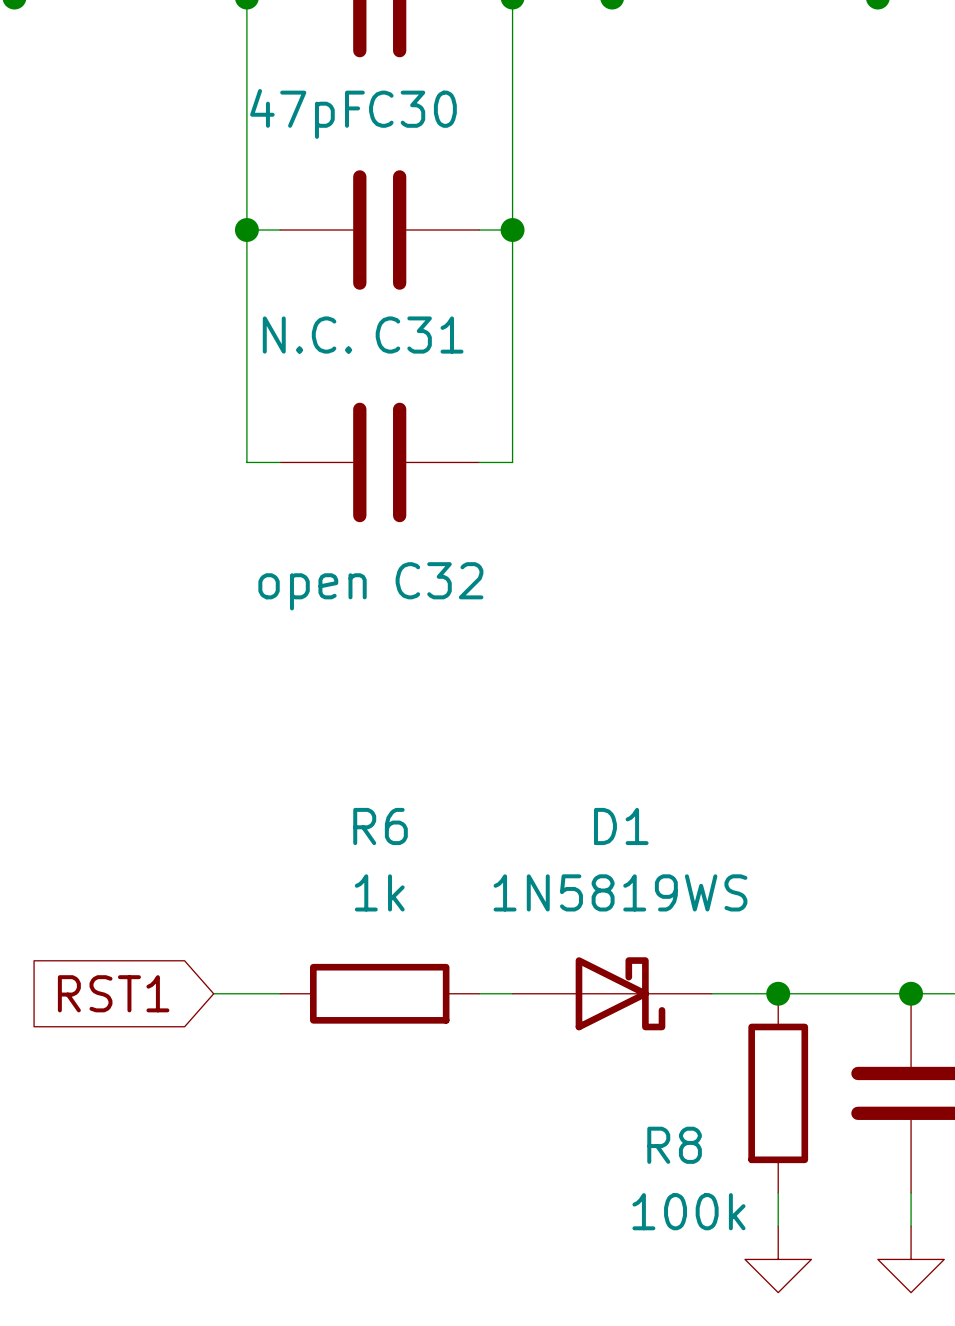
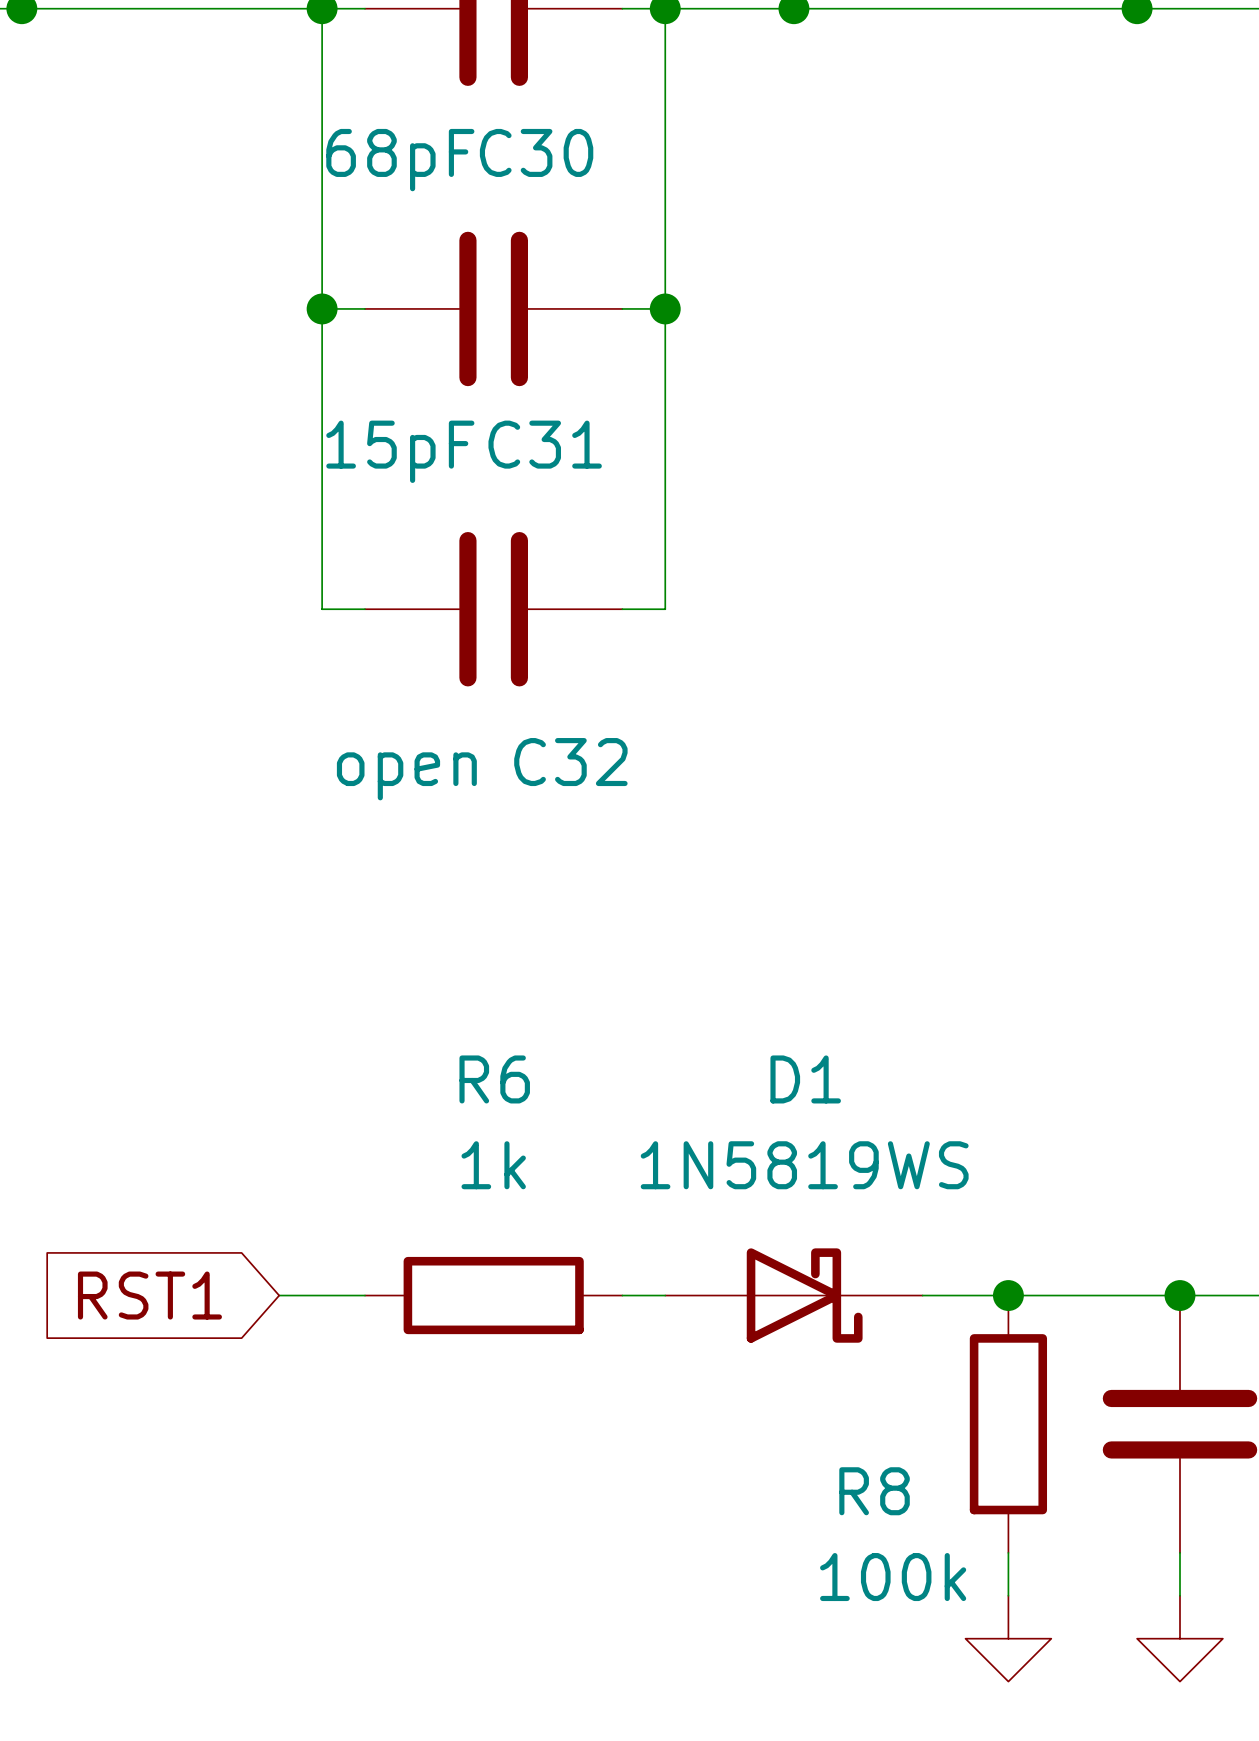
C30 value: 47pF (307, 113) -> 68pF (400, 160)
C31 value: N.C. (307, 335) -> 15pF (400, 451)

